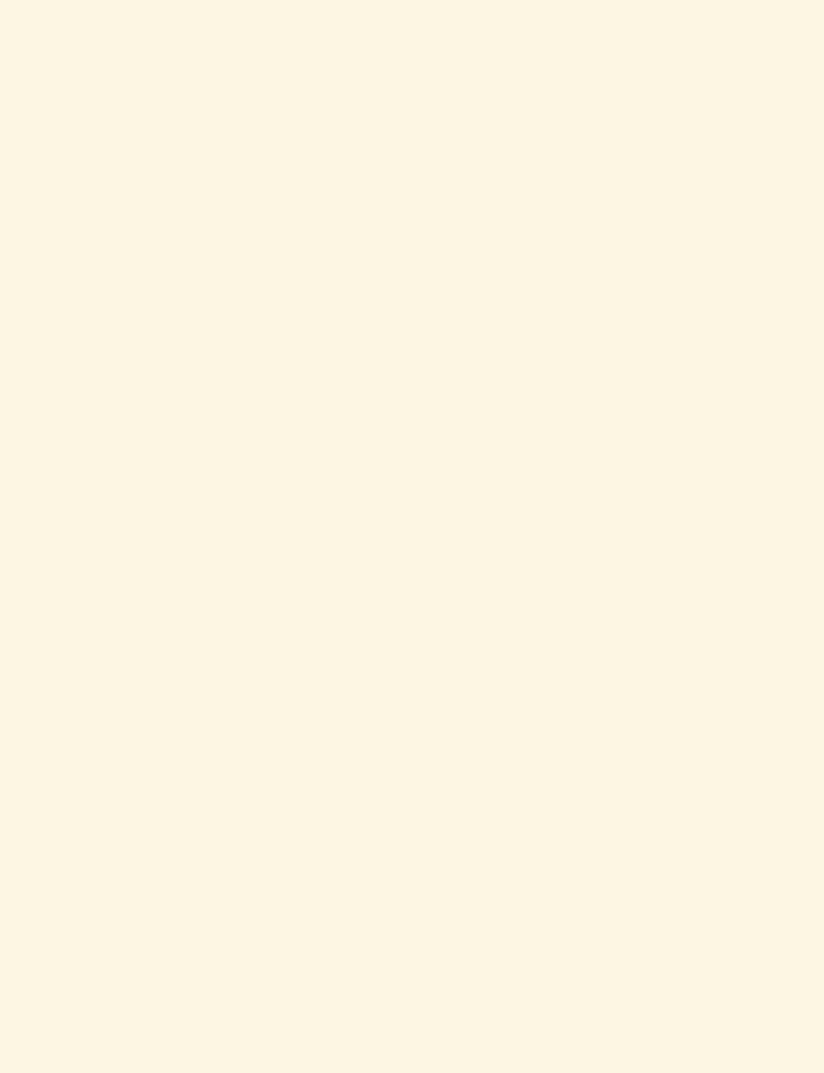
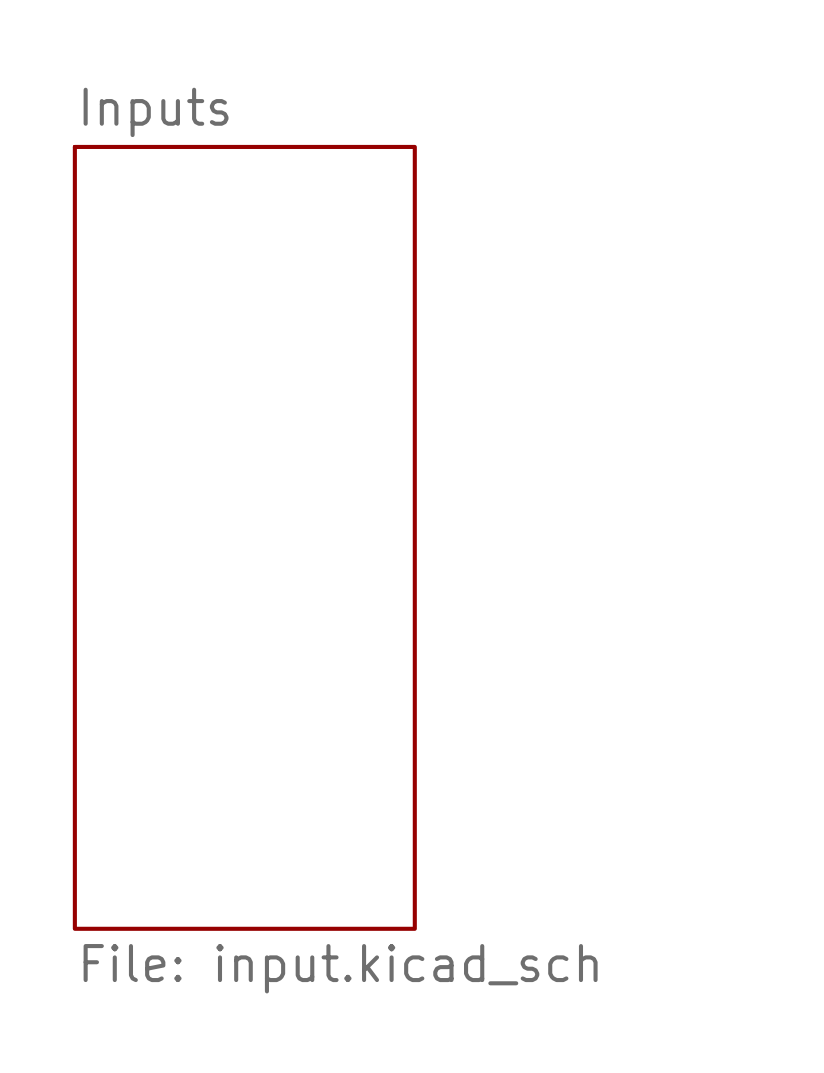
sheet Inputs: none -> File: input.kicad_sch (244, 537)

